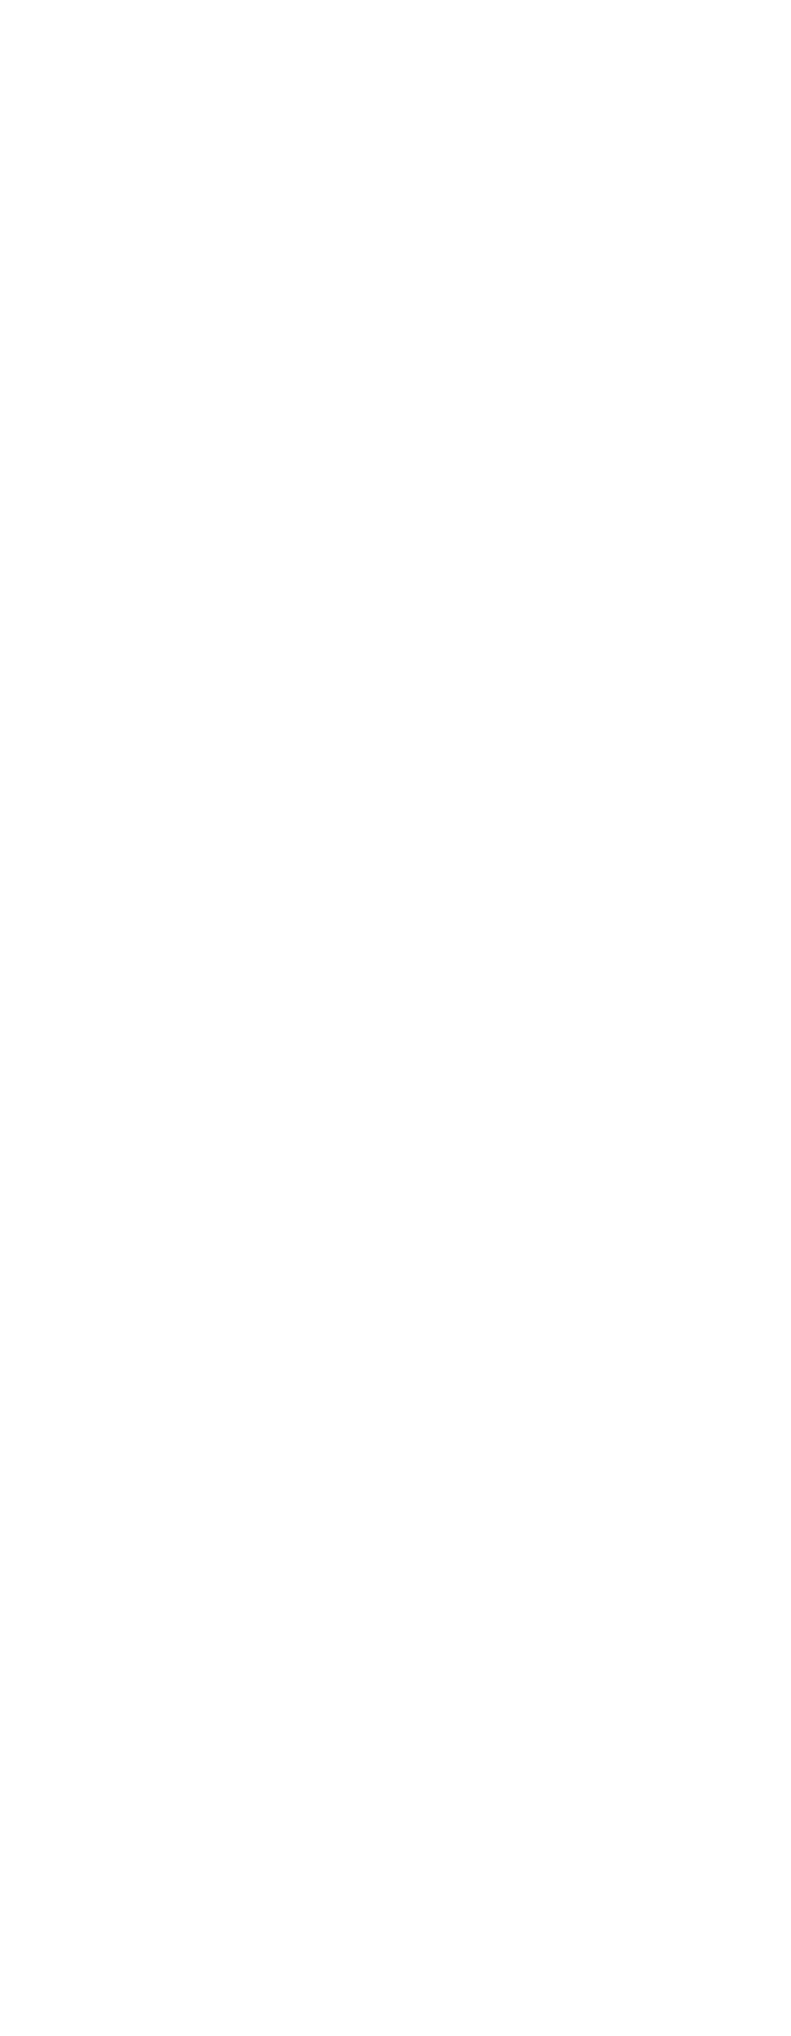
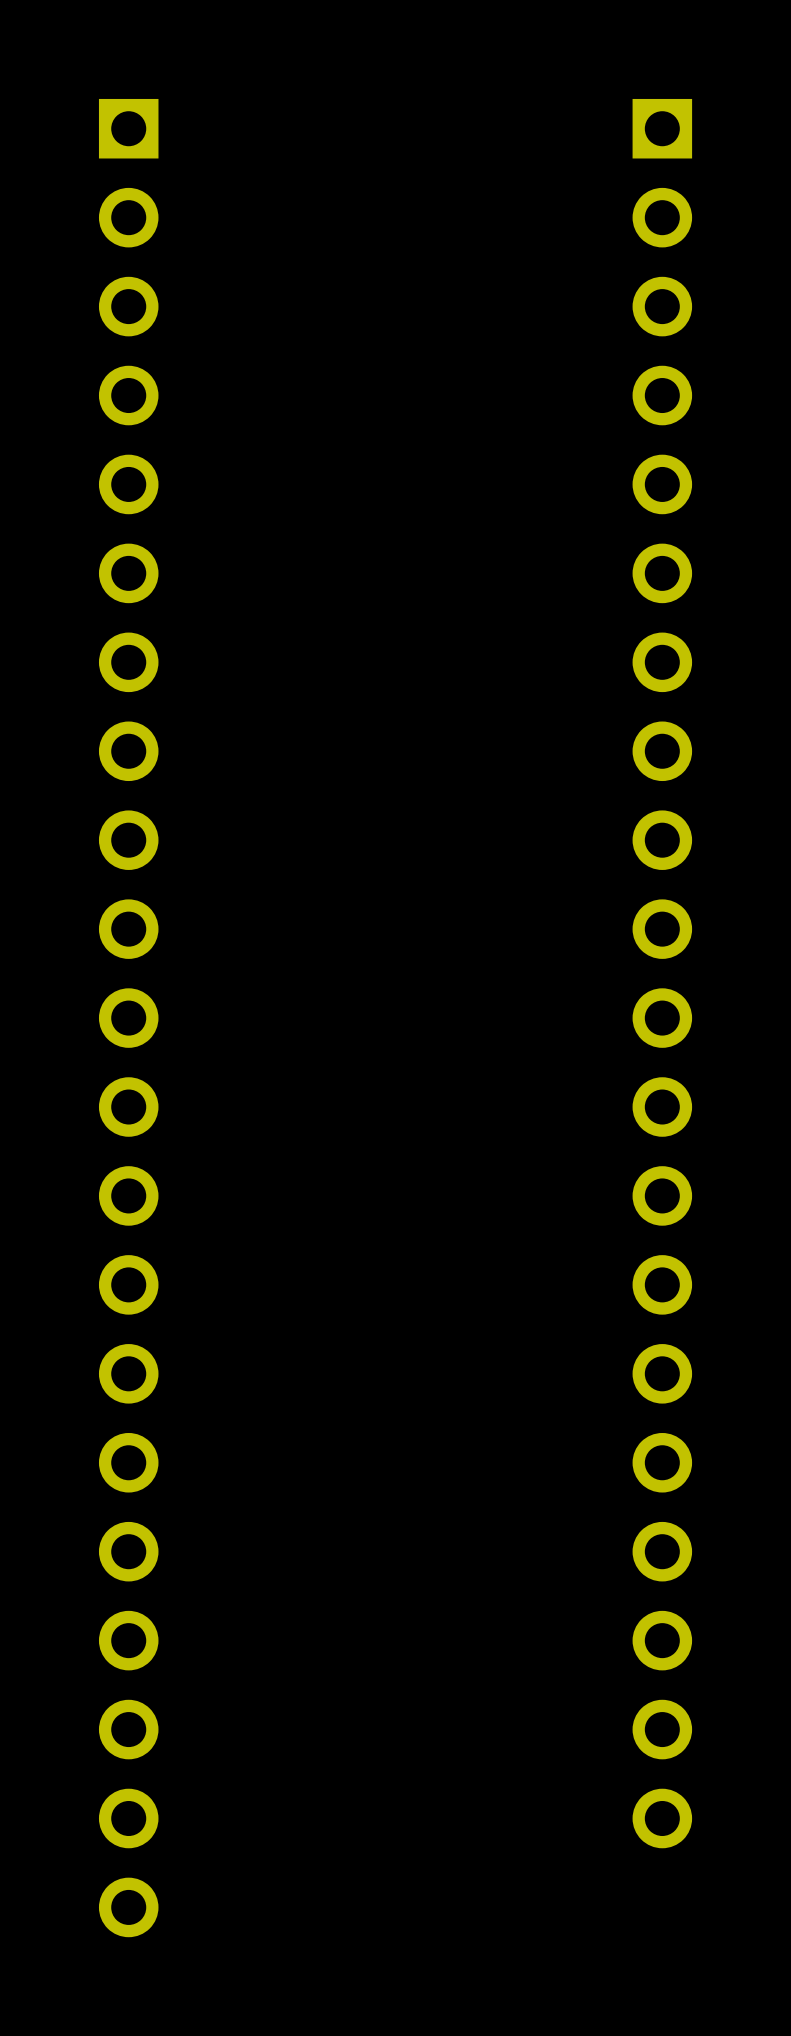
part: none -> (662, 973)
part: none -> (128, 1018)

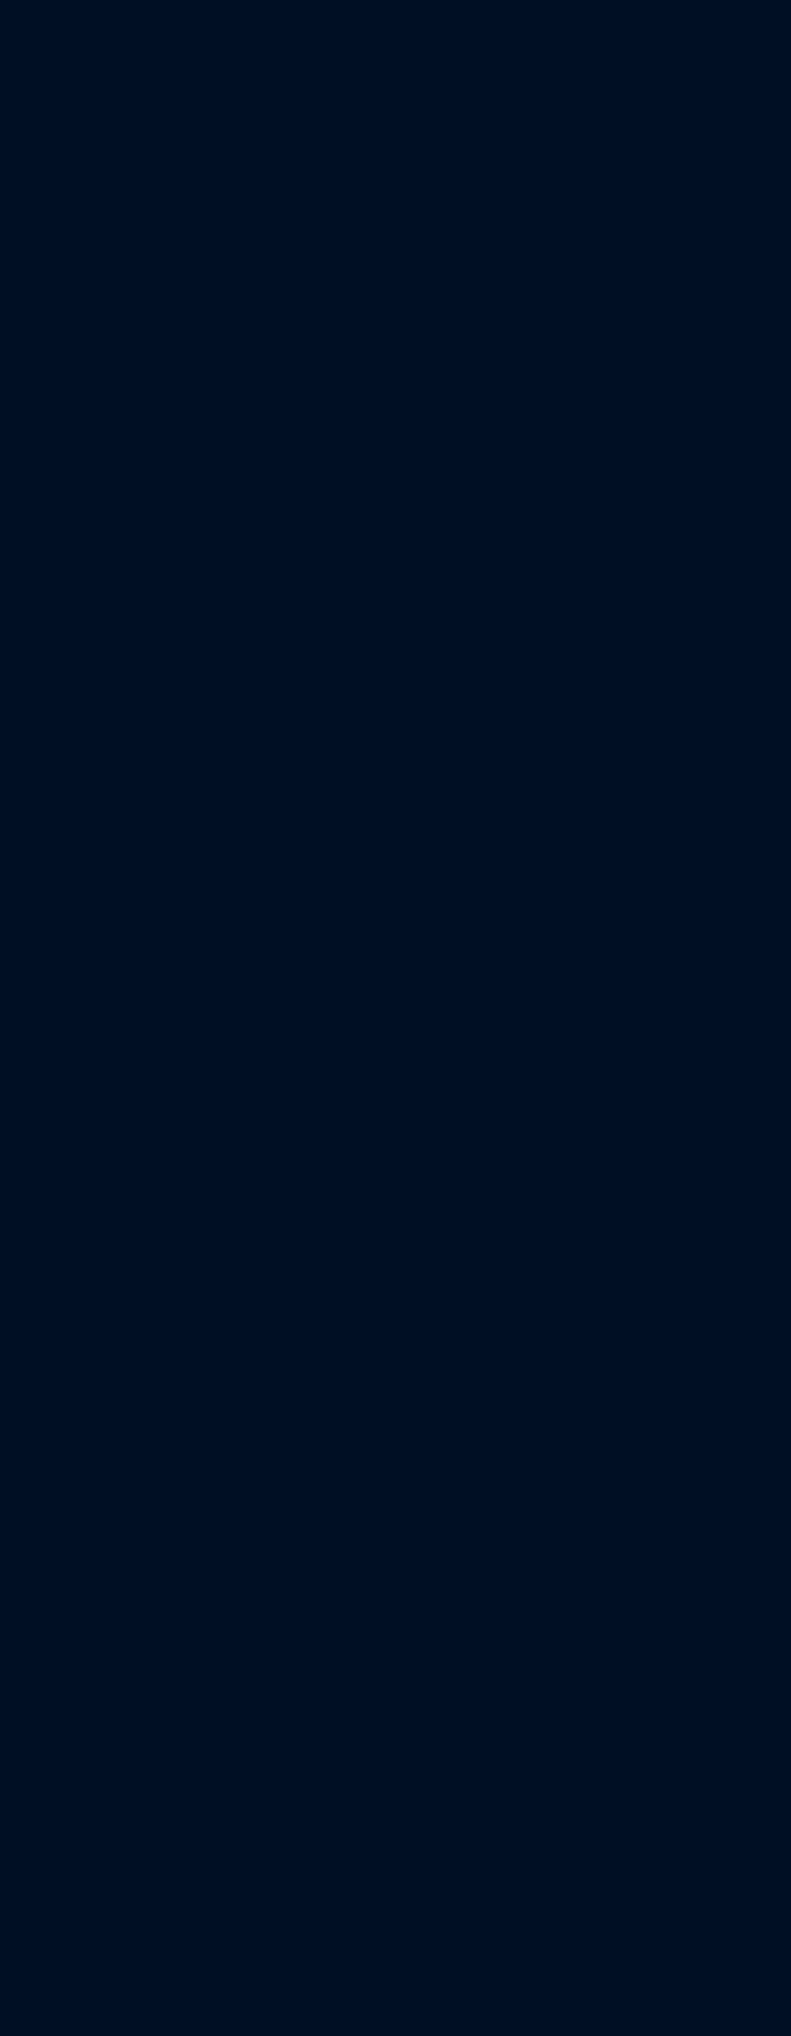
part: (662, 973) -> none
part: (128, 1018) -> none

